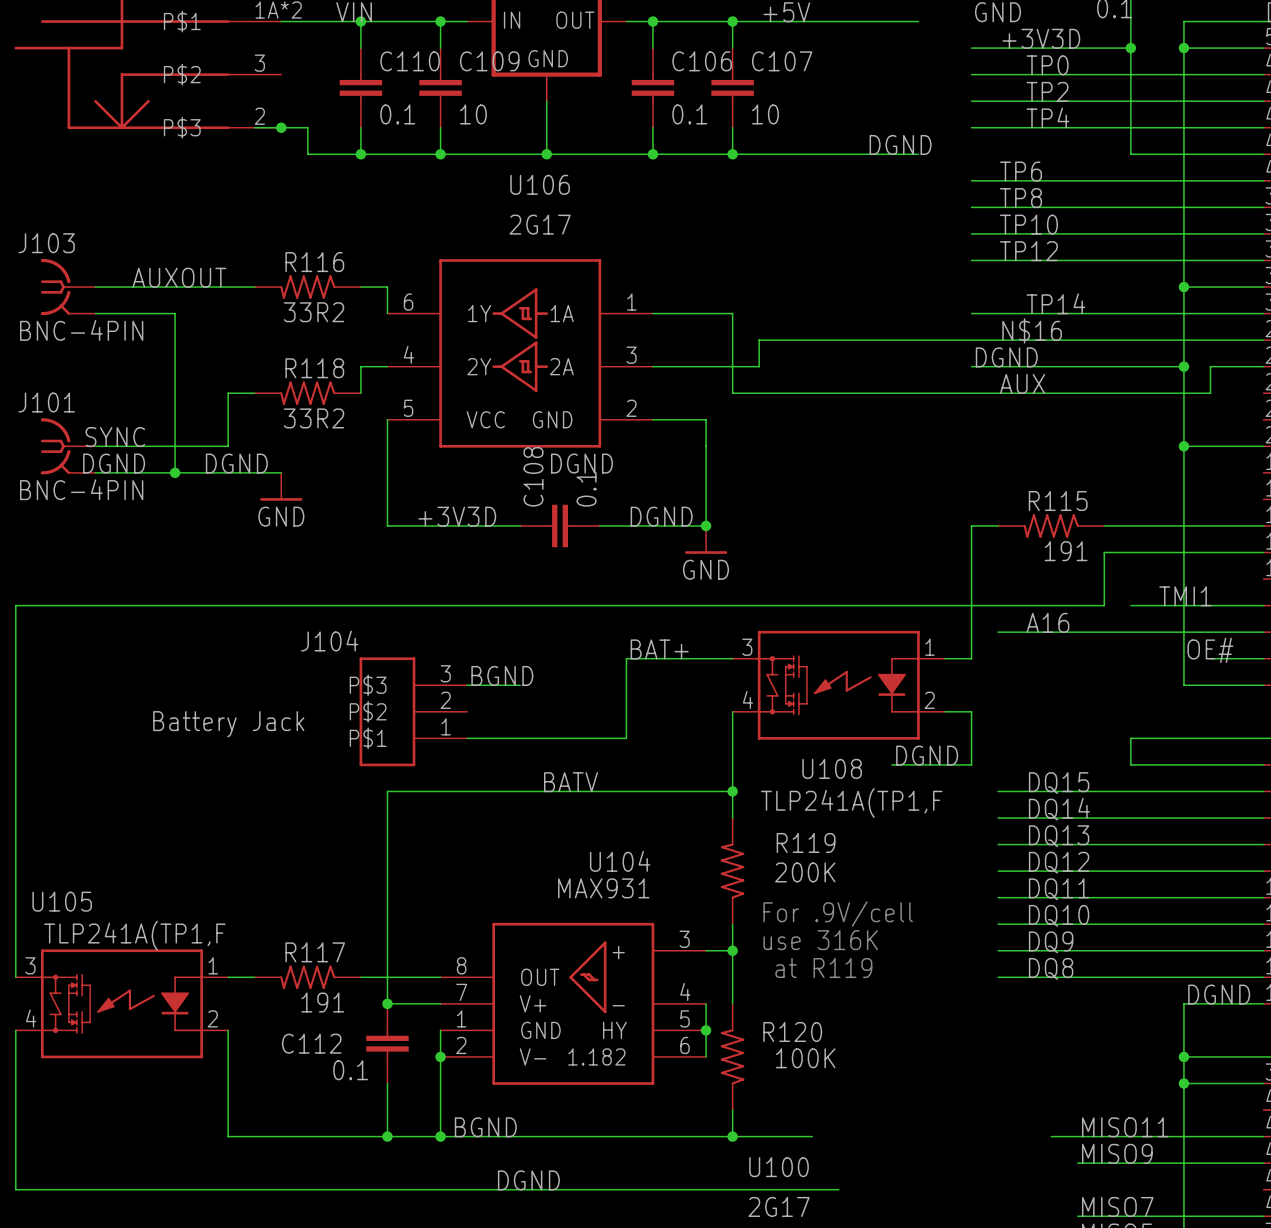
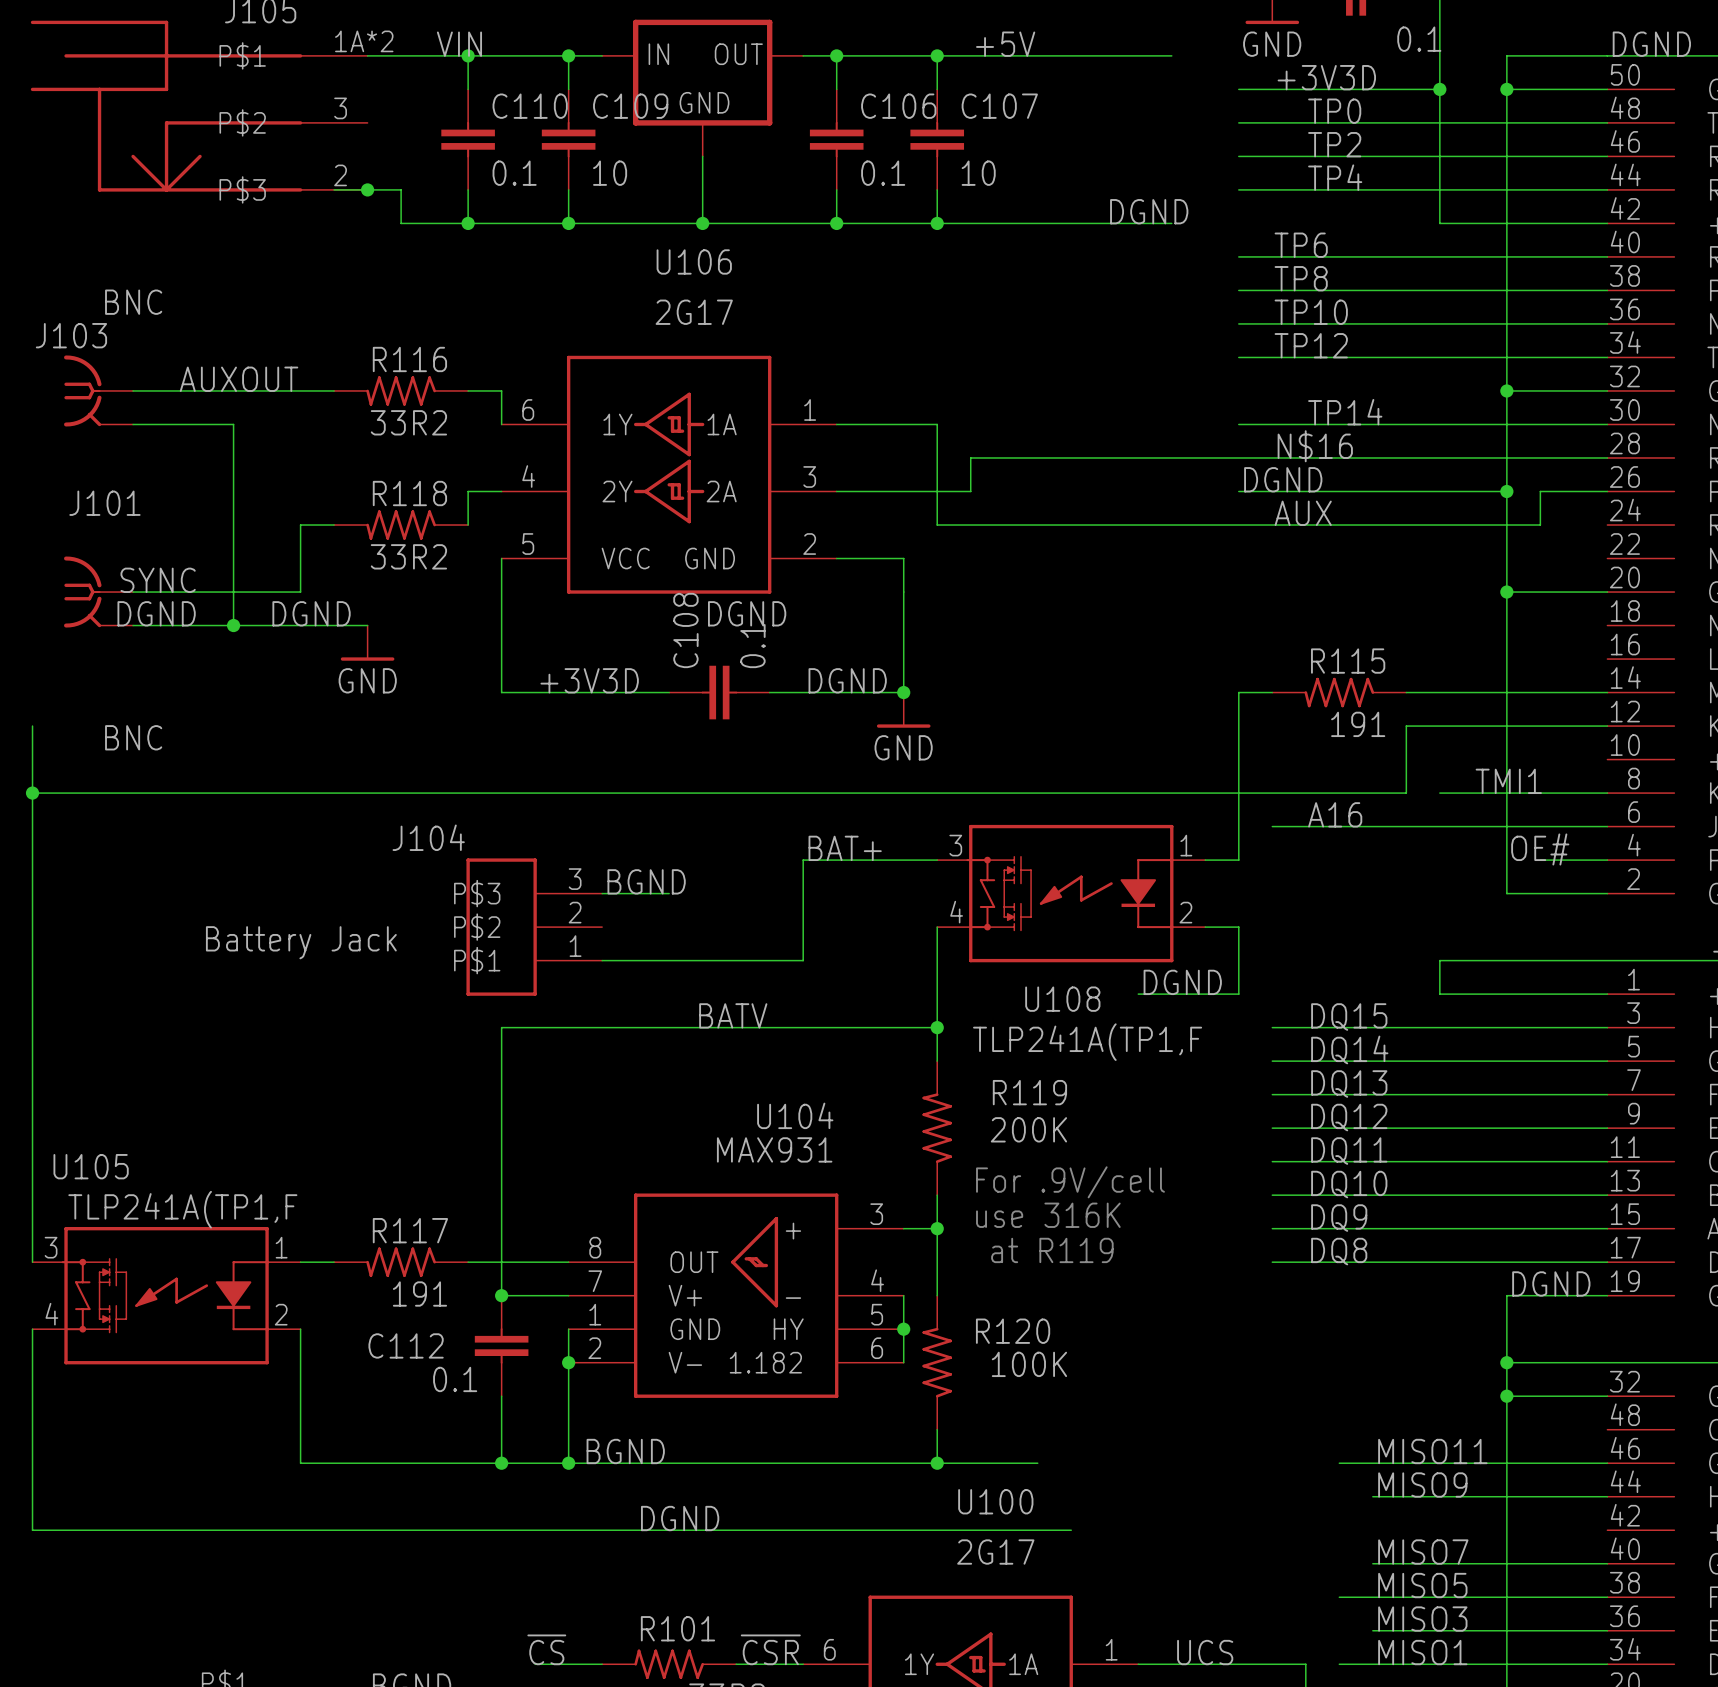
J103 value: BNC-4PIN (81, 330) -> BNC (133, 302)
J101 name position: J101 (46, 402) -> J101 (104, 503)
J101 value: BNC-4PIN (81, 489) -> BNC (133, 737)
wire: none -> (32, 726) (32, 793)
junction: none -> (32, 793)

